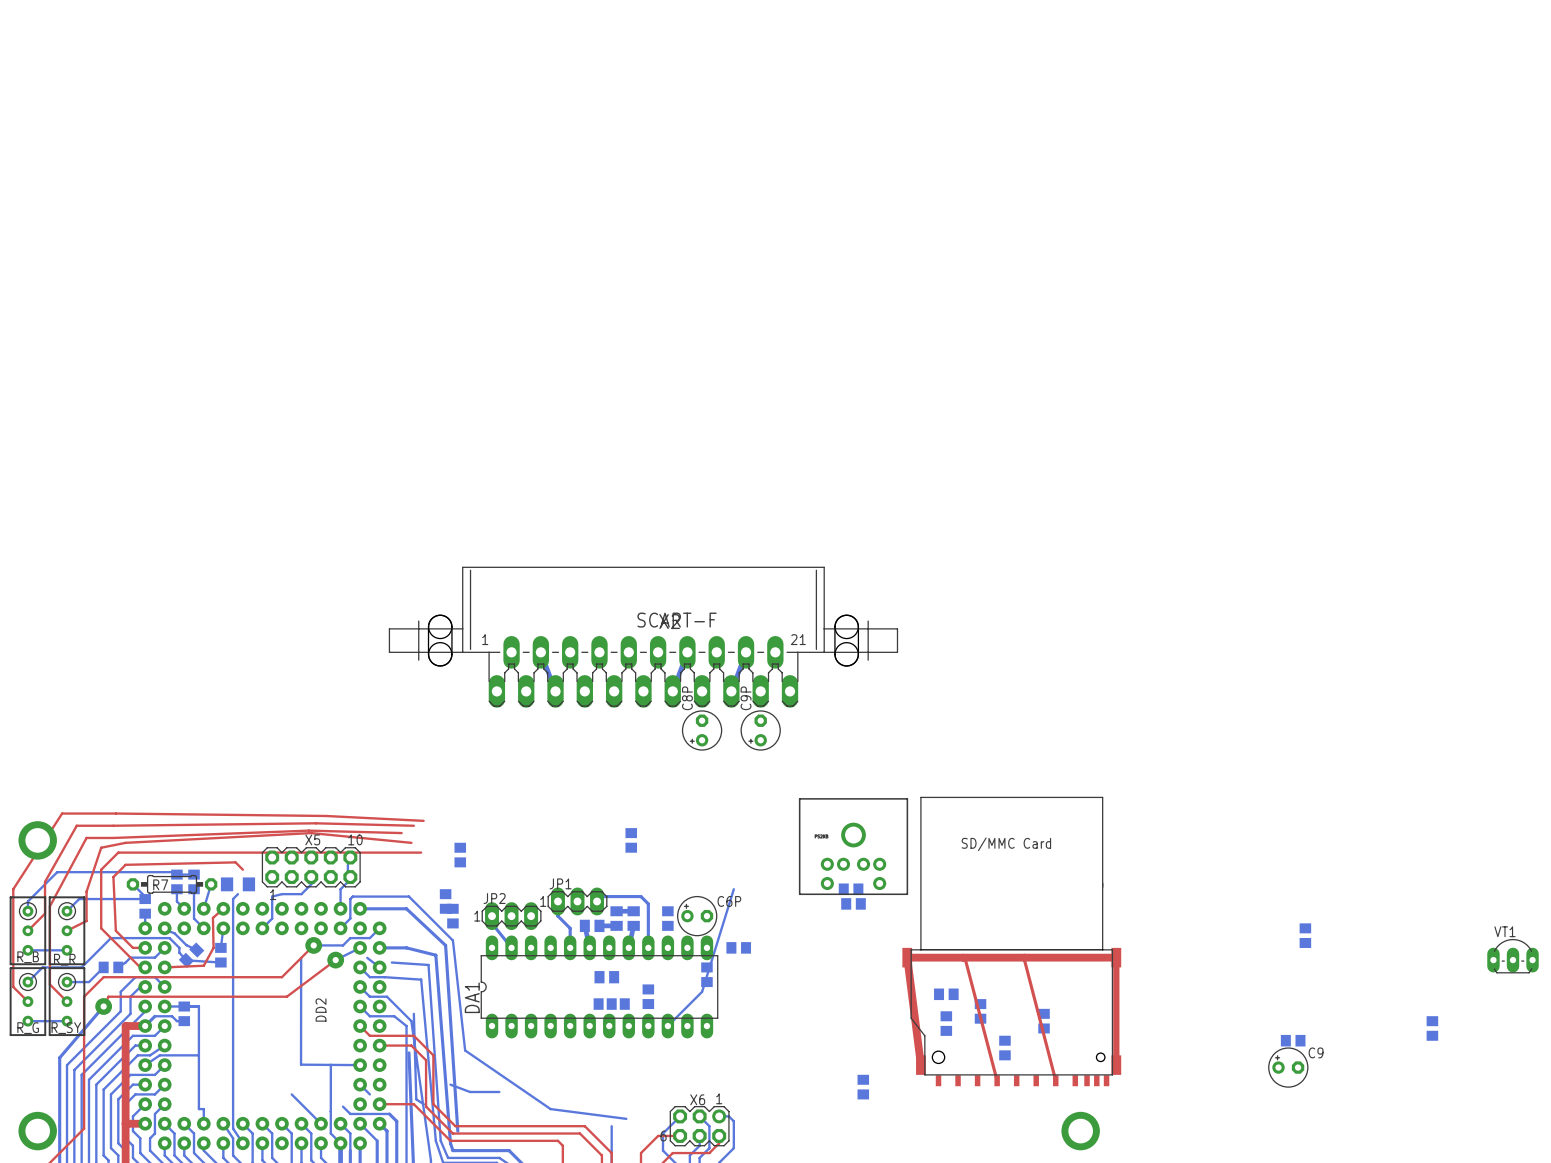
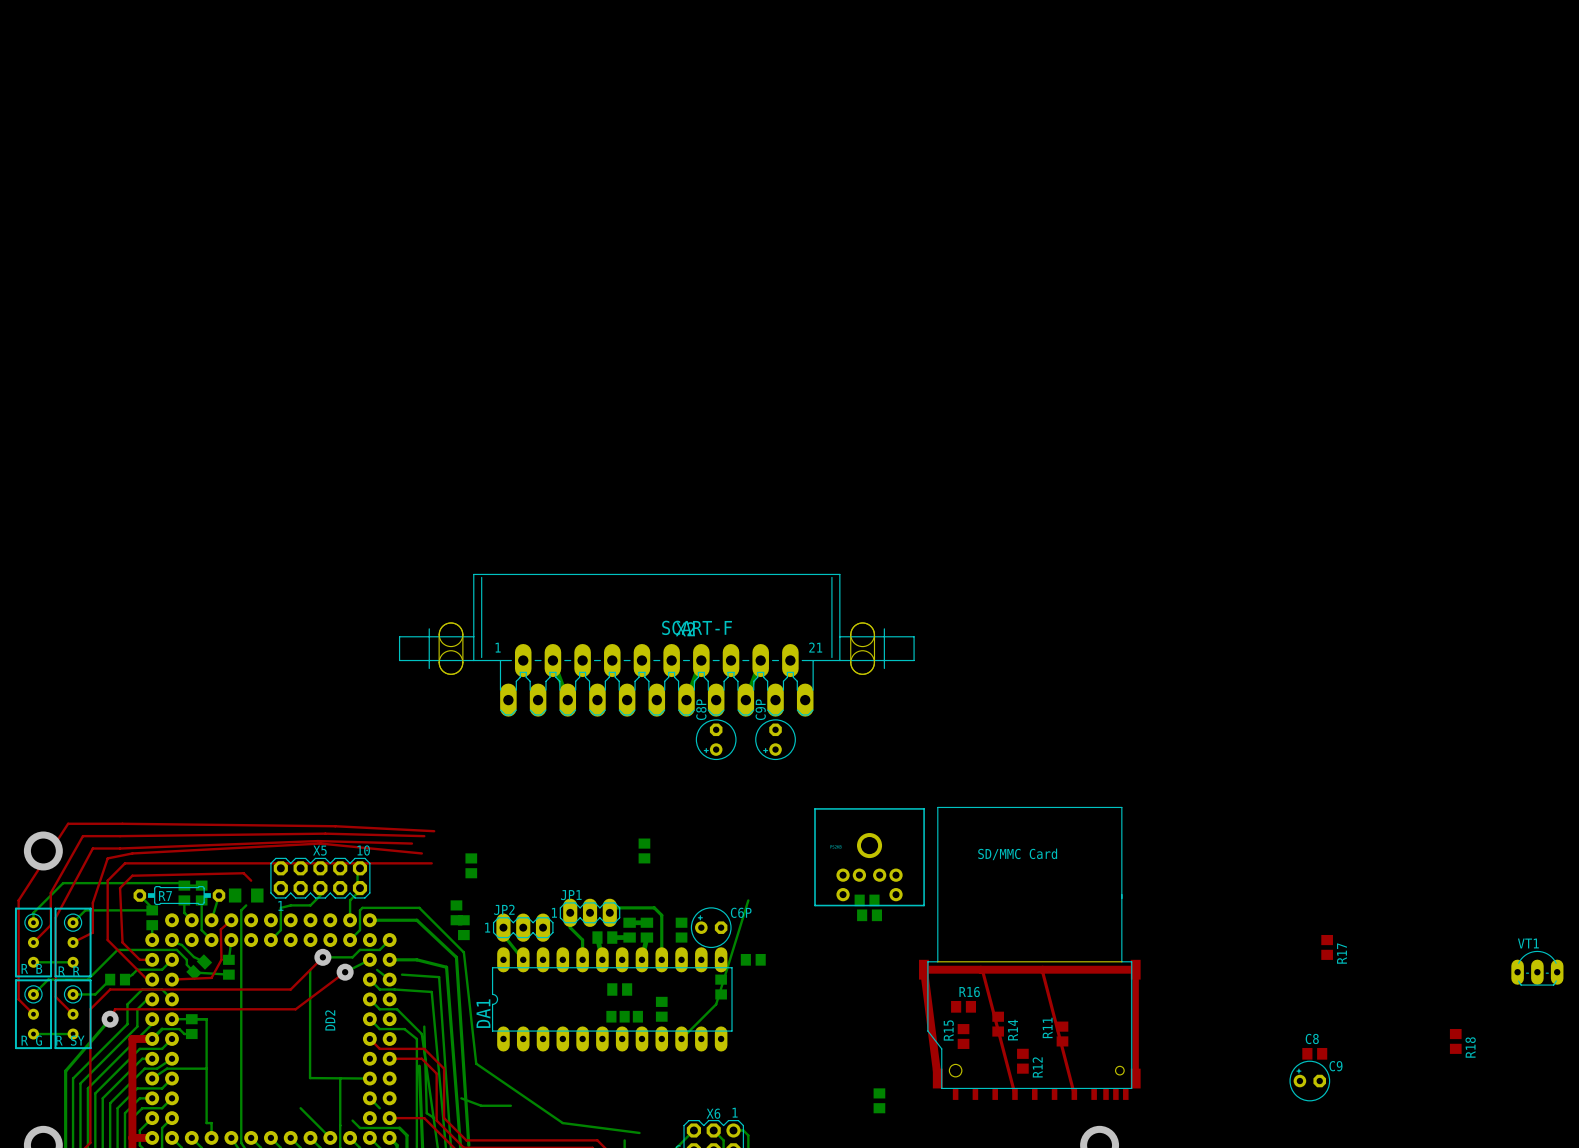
R17 side: bottom (1305, 935) -> top (1327, 947)
R16 side: bottom (946, 994) -> top (963, 1006)
R14 side: bottom (980, 1011) -> top (998, 1024)
R11 side: bottom (1044, 1021) -> top (1062, 1034)
R15 side: bottom (946, 1023) -> top (963, 1036)
R18 side: bottom (1432, 1028) -> top (1455, 1041)
C8 side: bottom (1293, 1040) -> top (1314, 1053)
R12 side: bottom (1004, 1048) -> top (1022, 1061)

